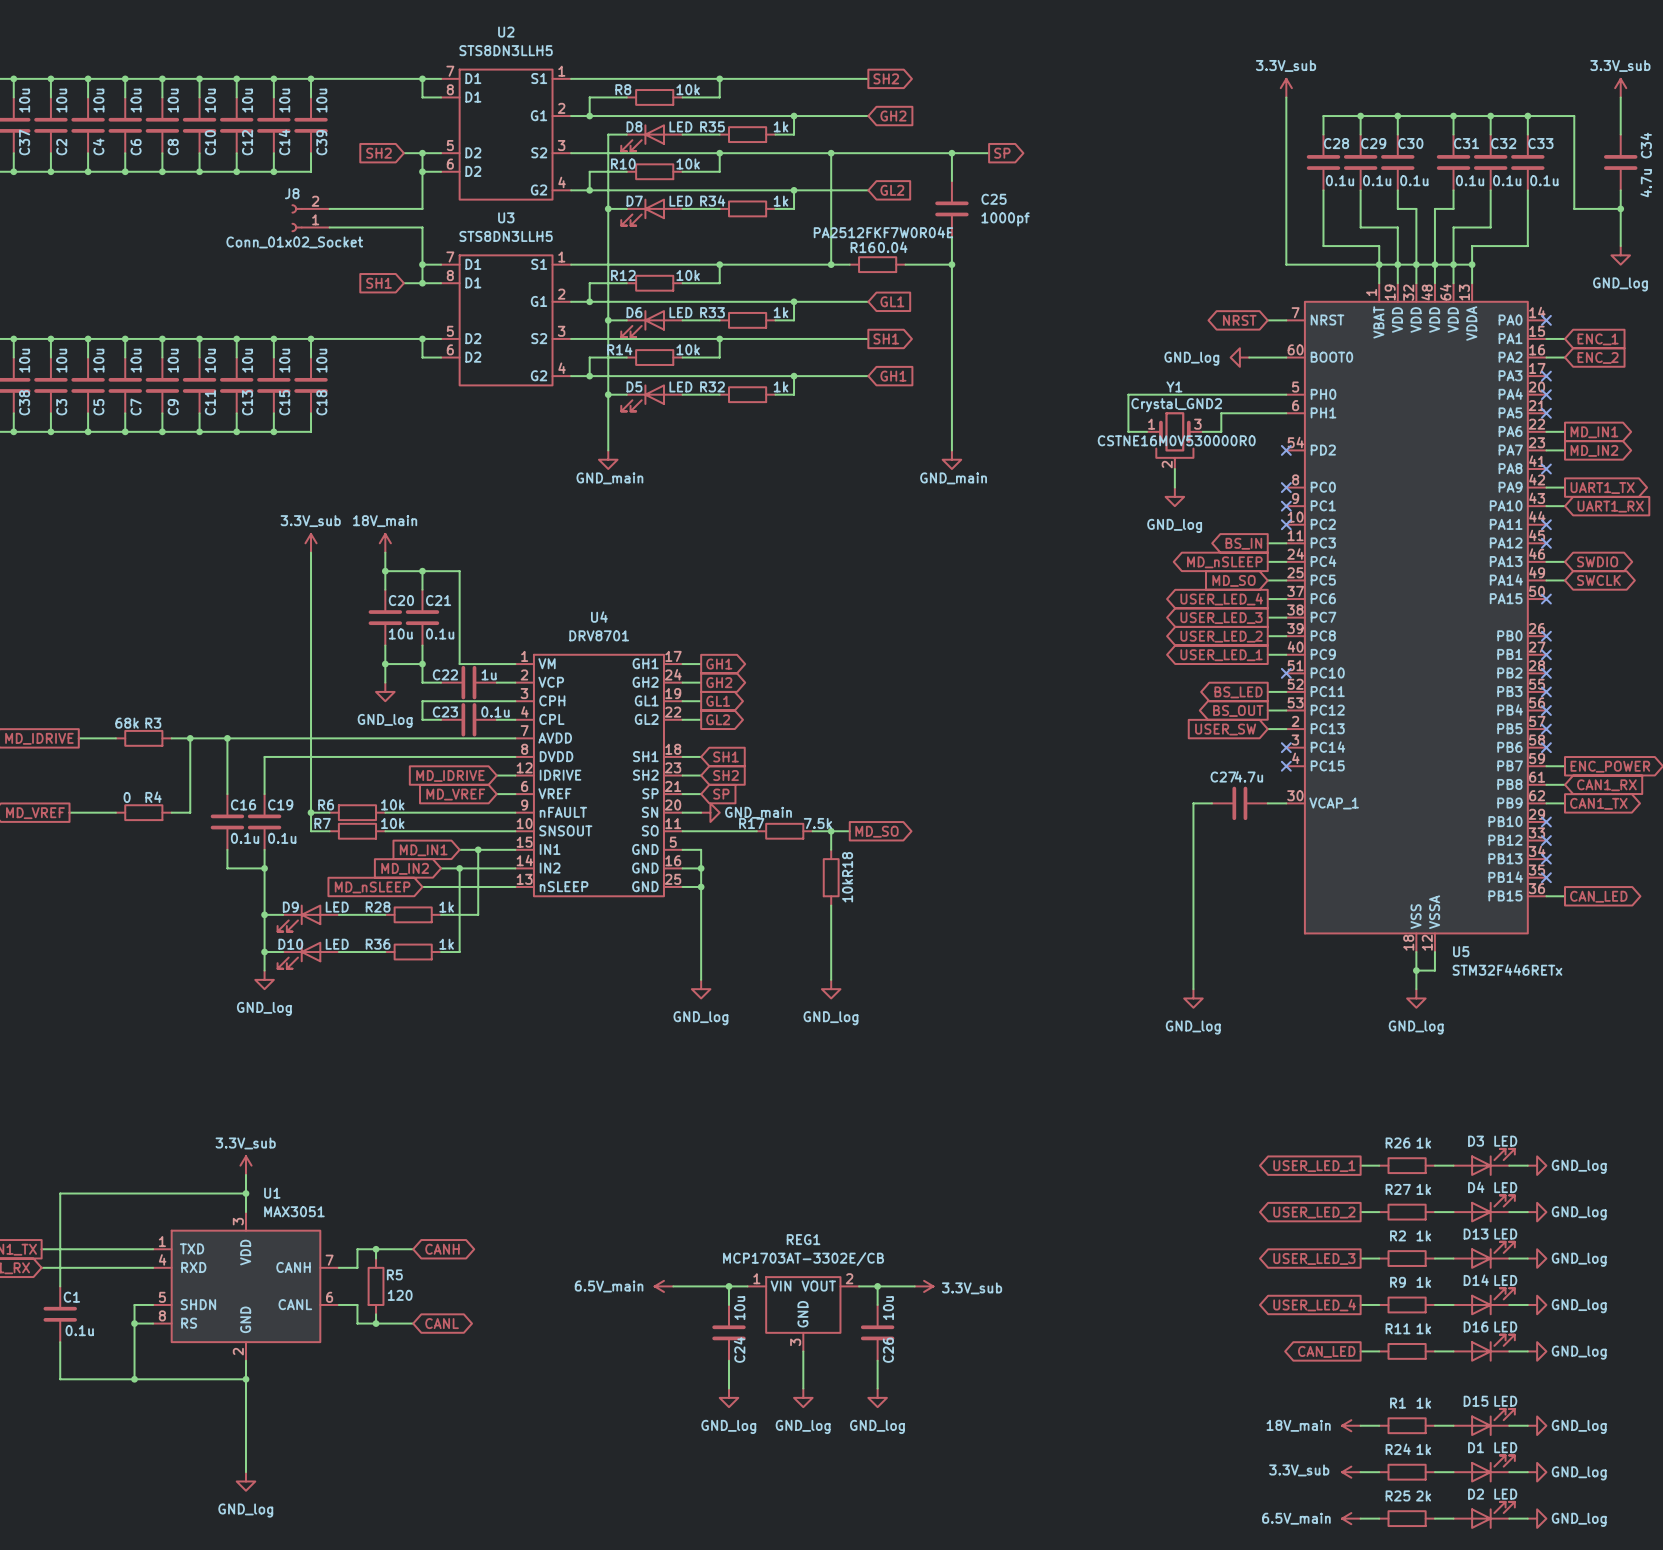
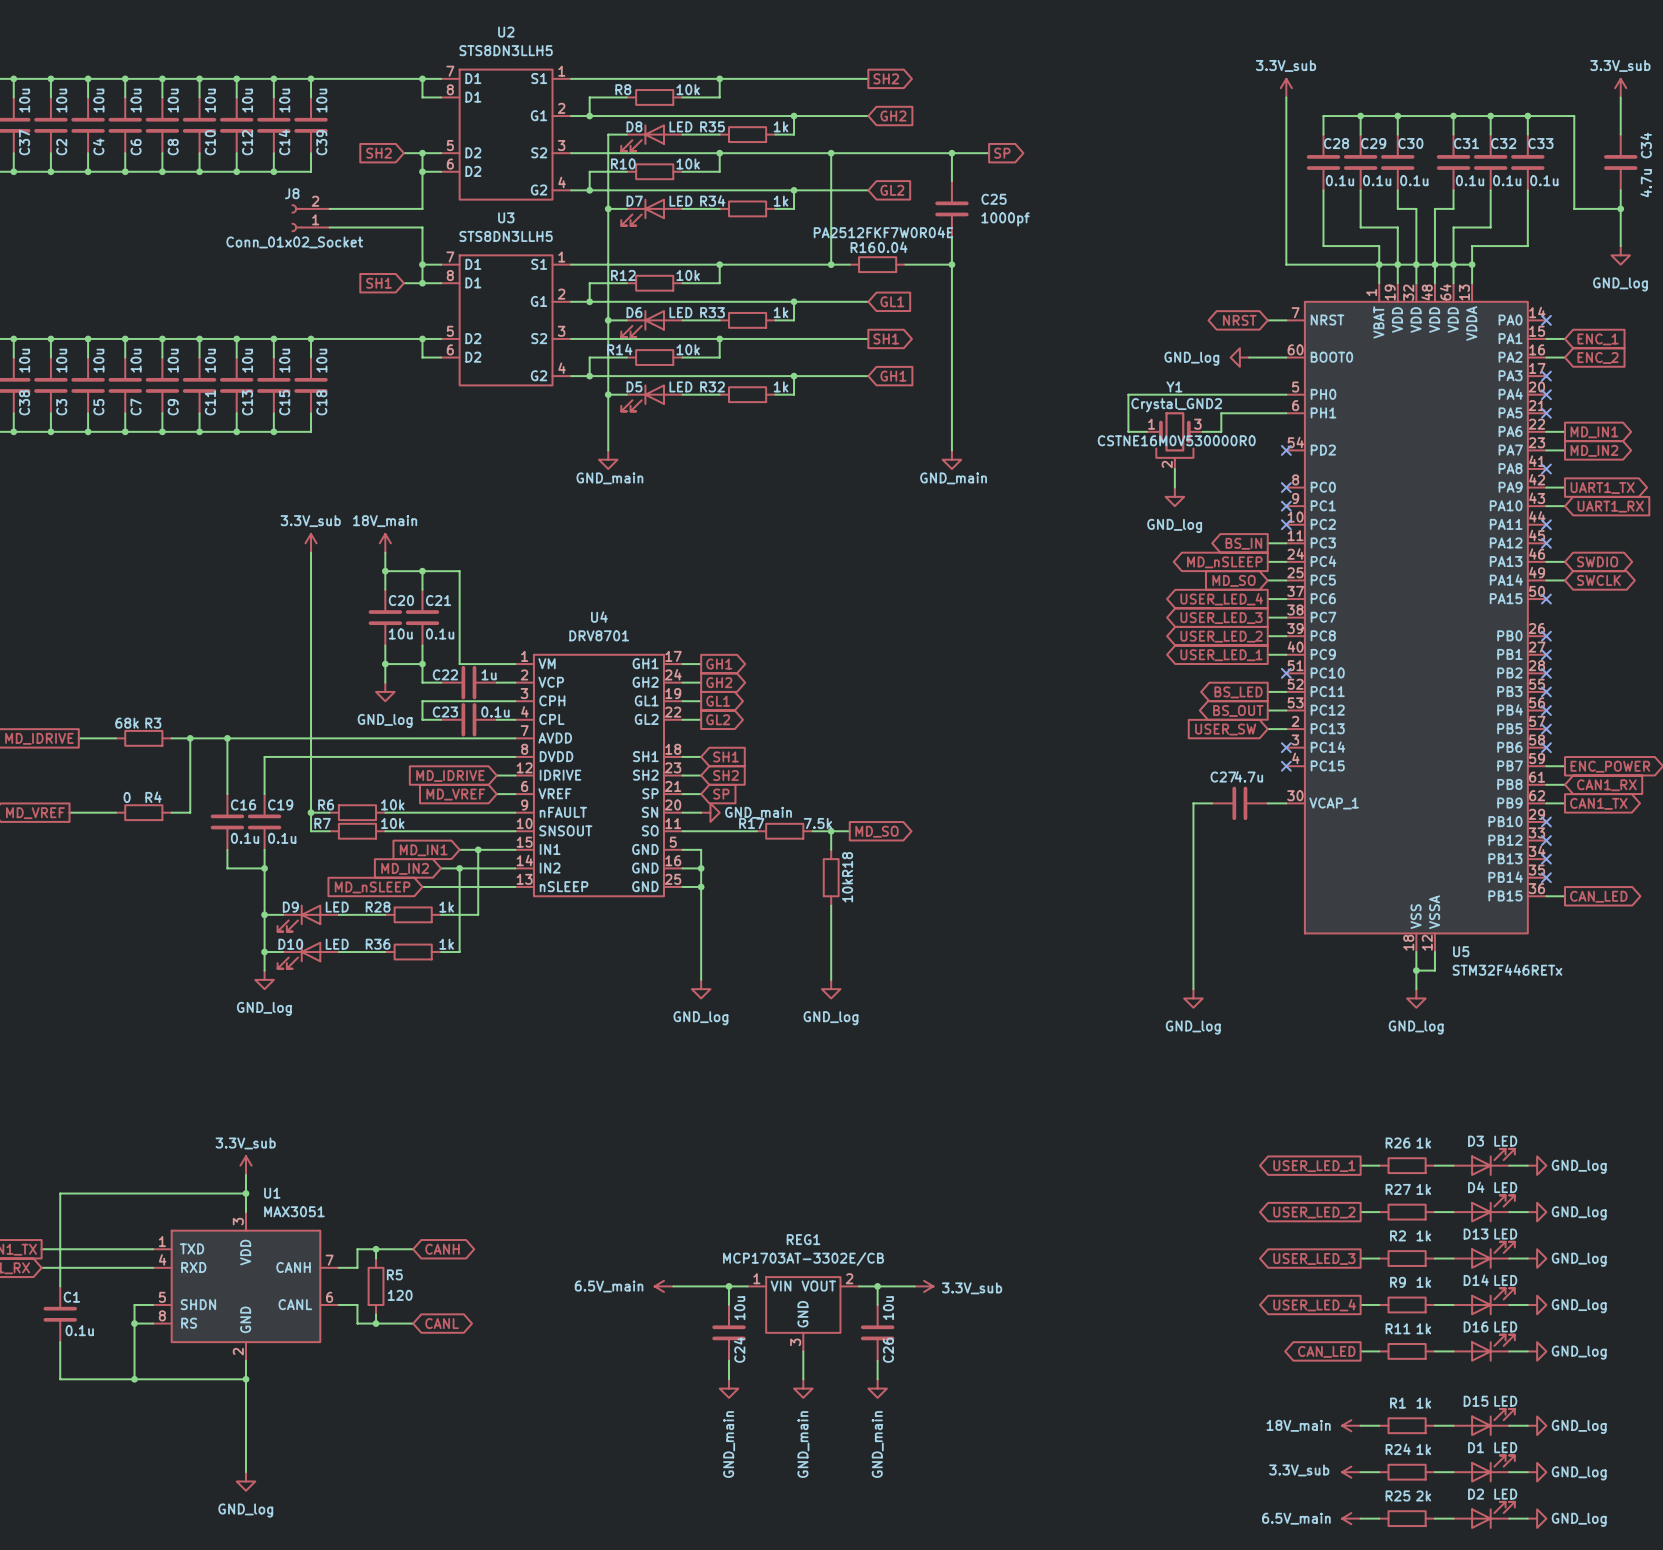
power symbol: none -> GND_main (729, 1388)
power symbol: none -> GND_main (803, 1388)
power symbol: none -> GND_main (877, 1388)
power symbol: GND_log (729, 1397) -> none
power symbol: GND_log (803, 1397) -> none
power symbol: GND_log (877, 1397) -> none

